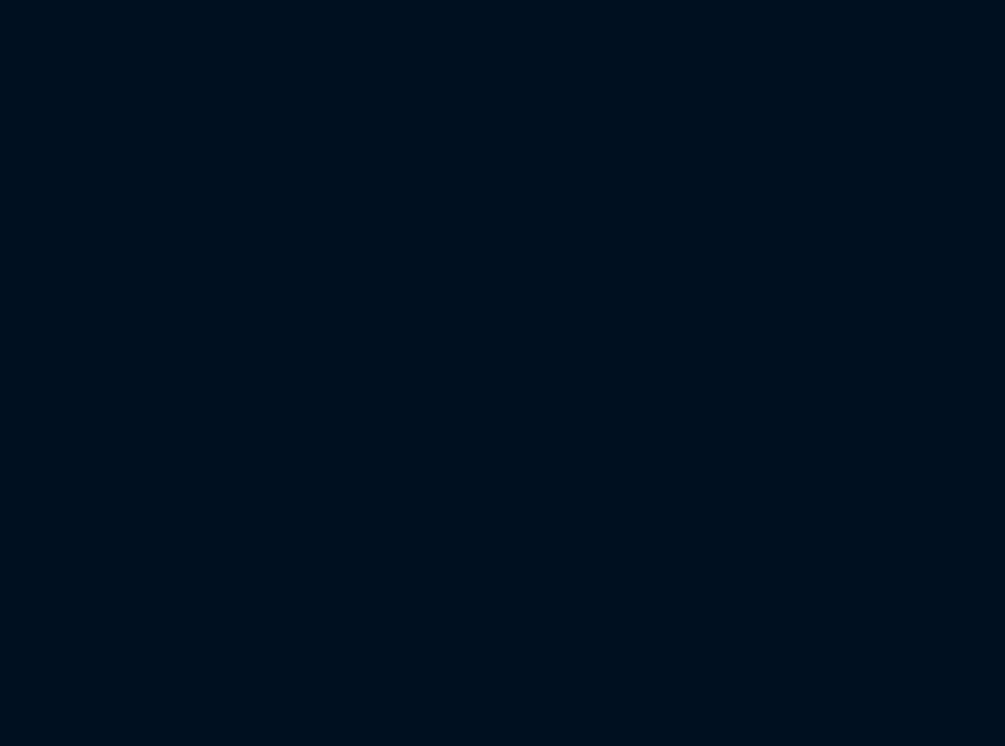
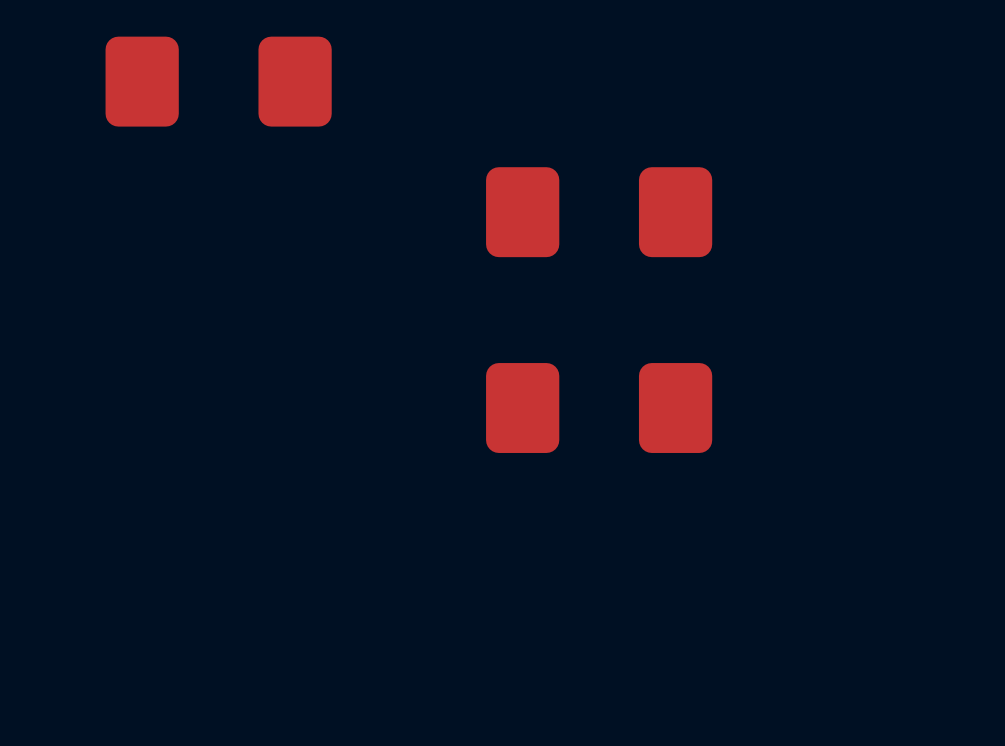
part: none -> (218, 81)
part: none -> (599, 212)
part: none -> (599, 408)

